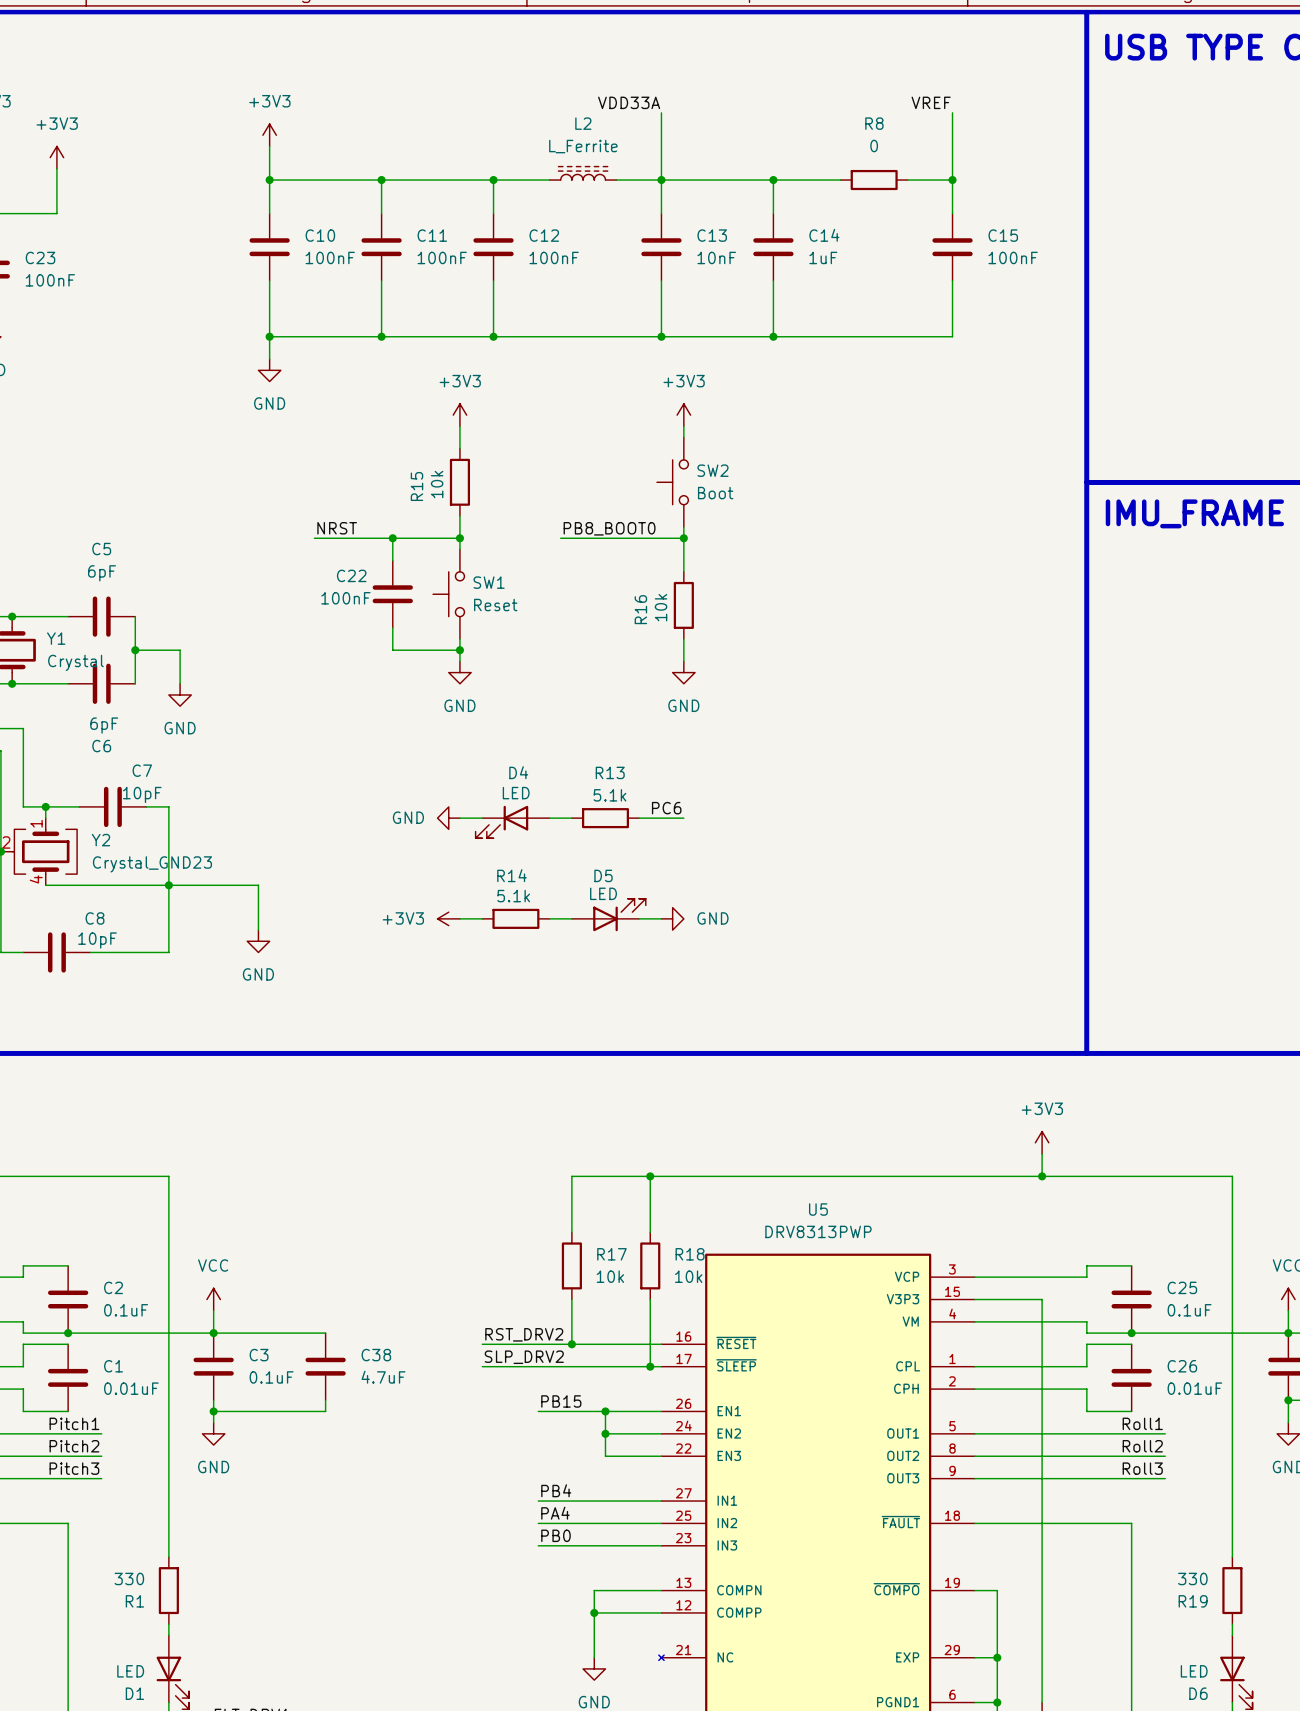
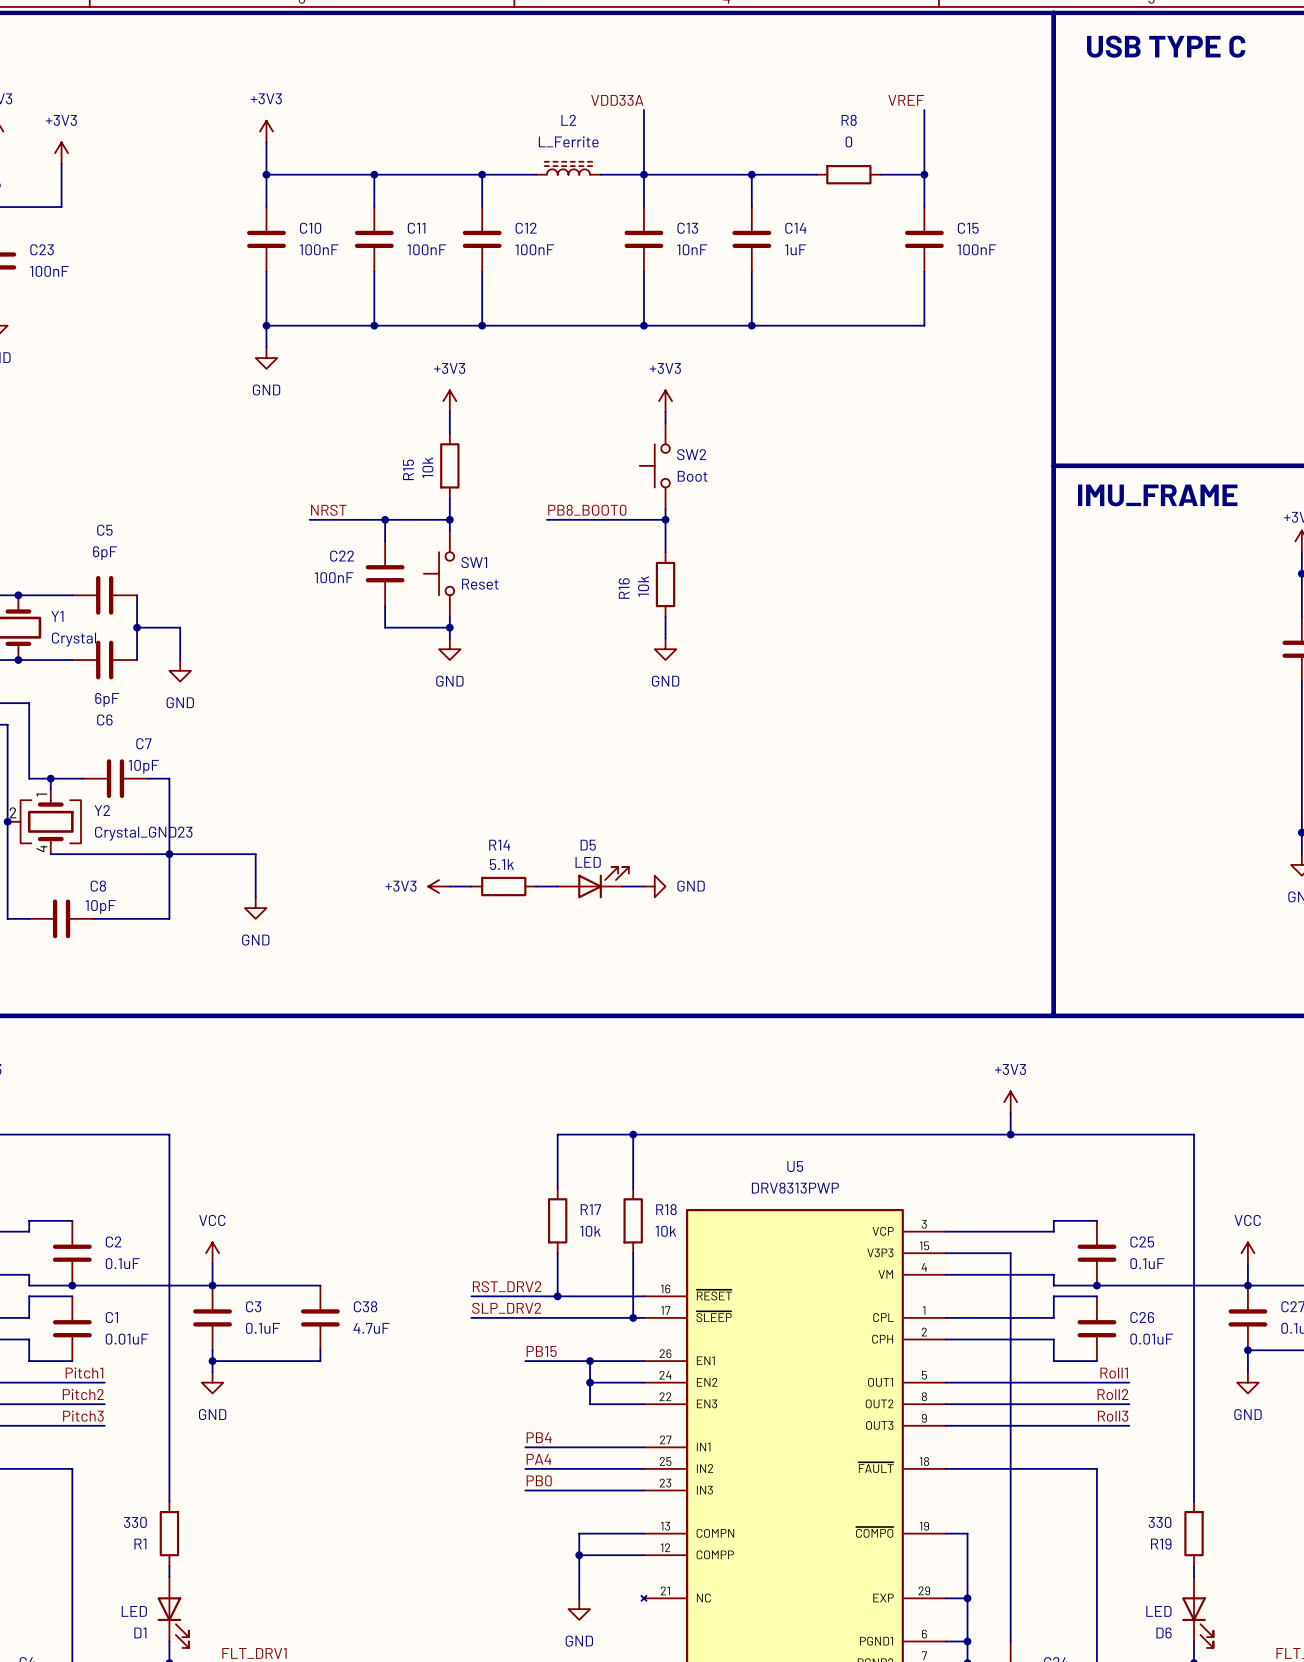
label: PC6 (666, 808) -> none
power symbol: GND (448, 818) -> none
wire: (459, 818) (482, 818) -> none
wire: (549, 818) (571, 818) -> none
R13: 5.1k (605, 818) -> none
wire: (639, 818) (683, 818) -> none
D4: LED (512, 822) -> none

